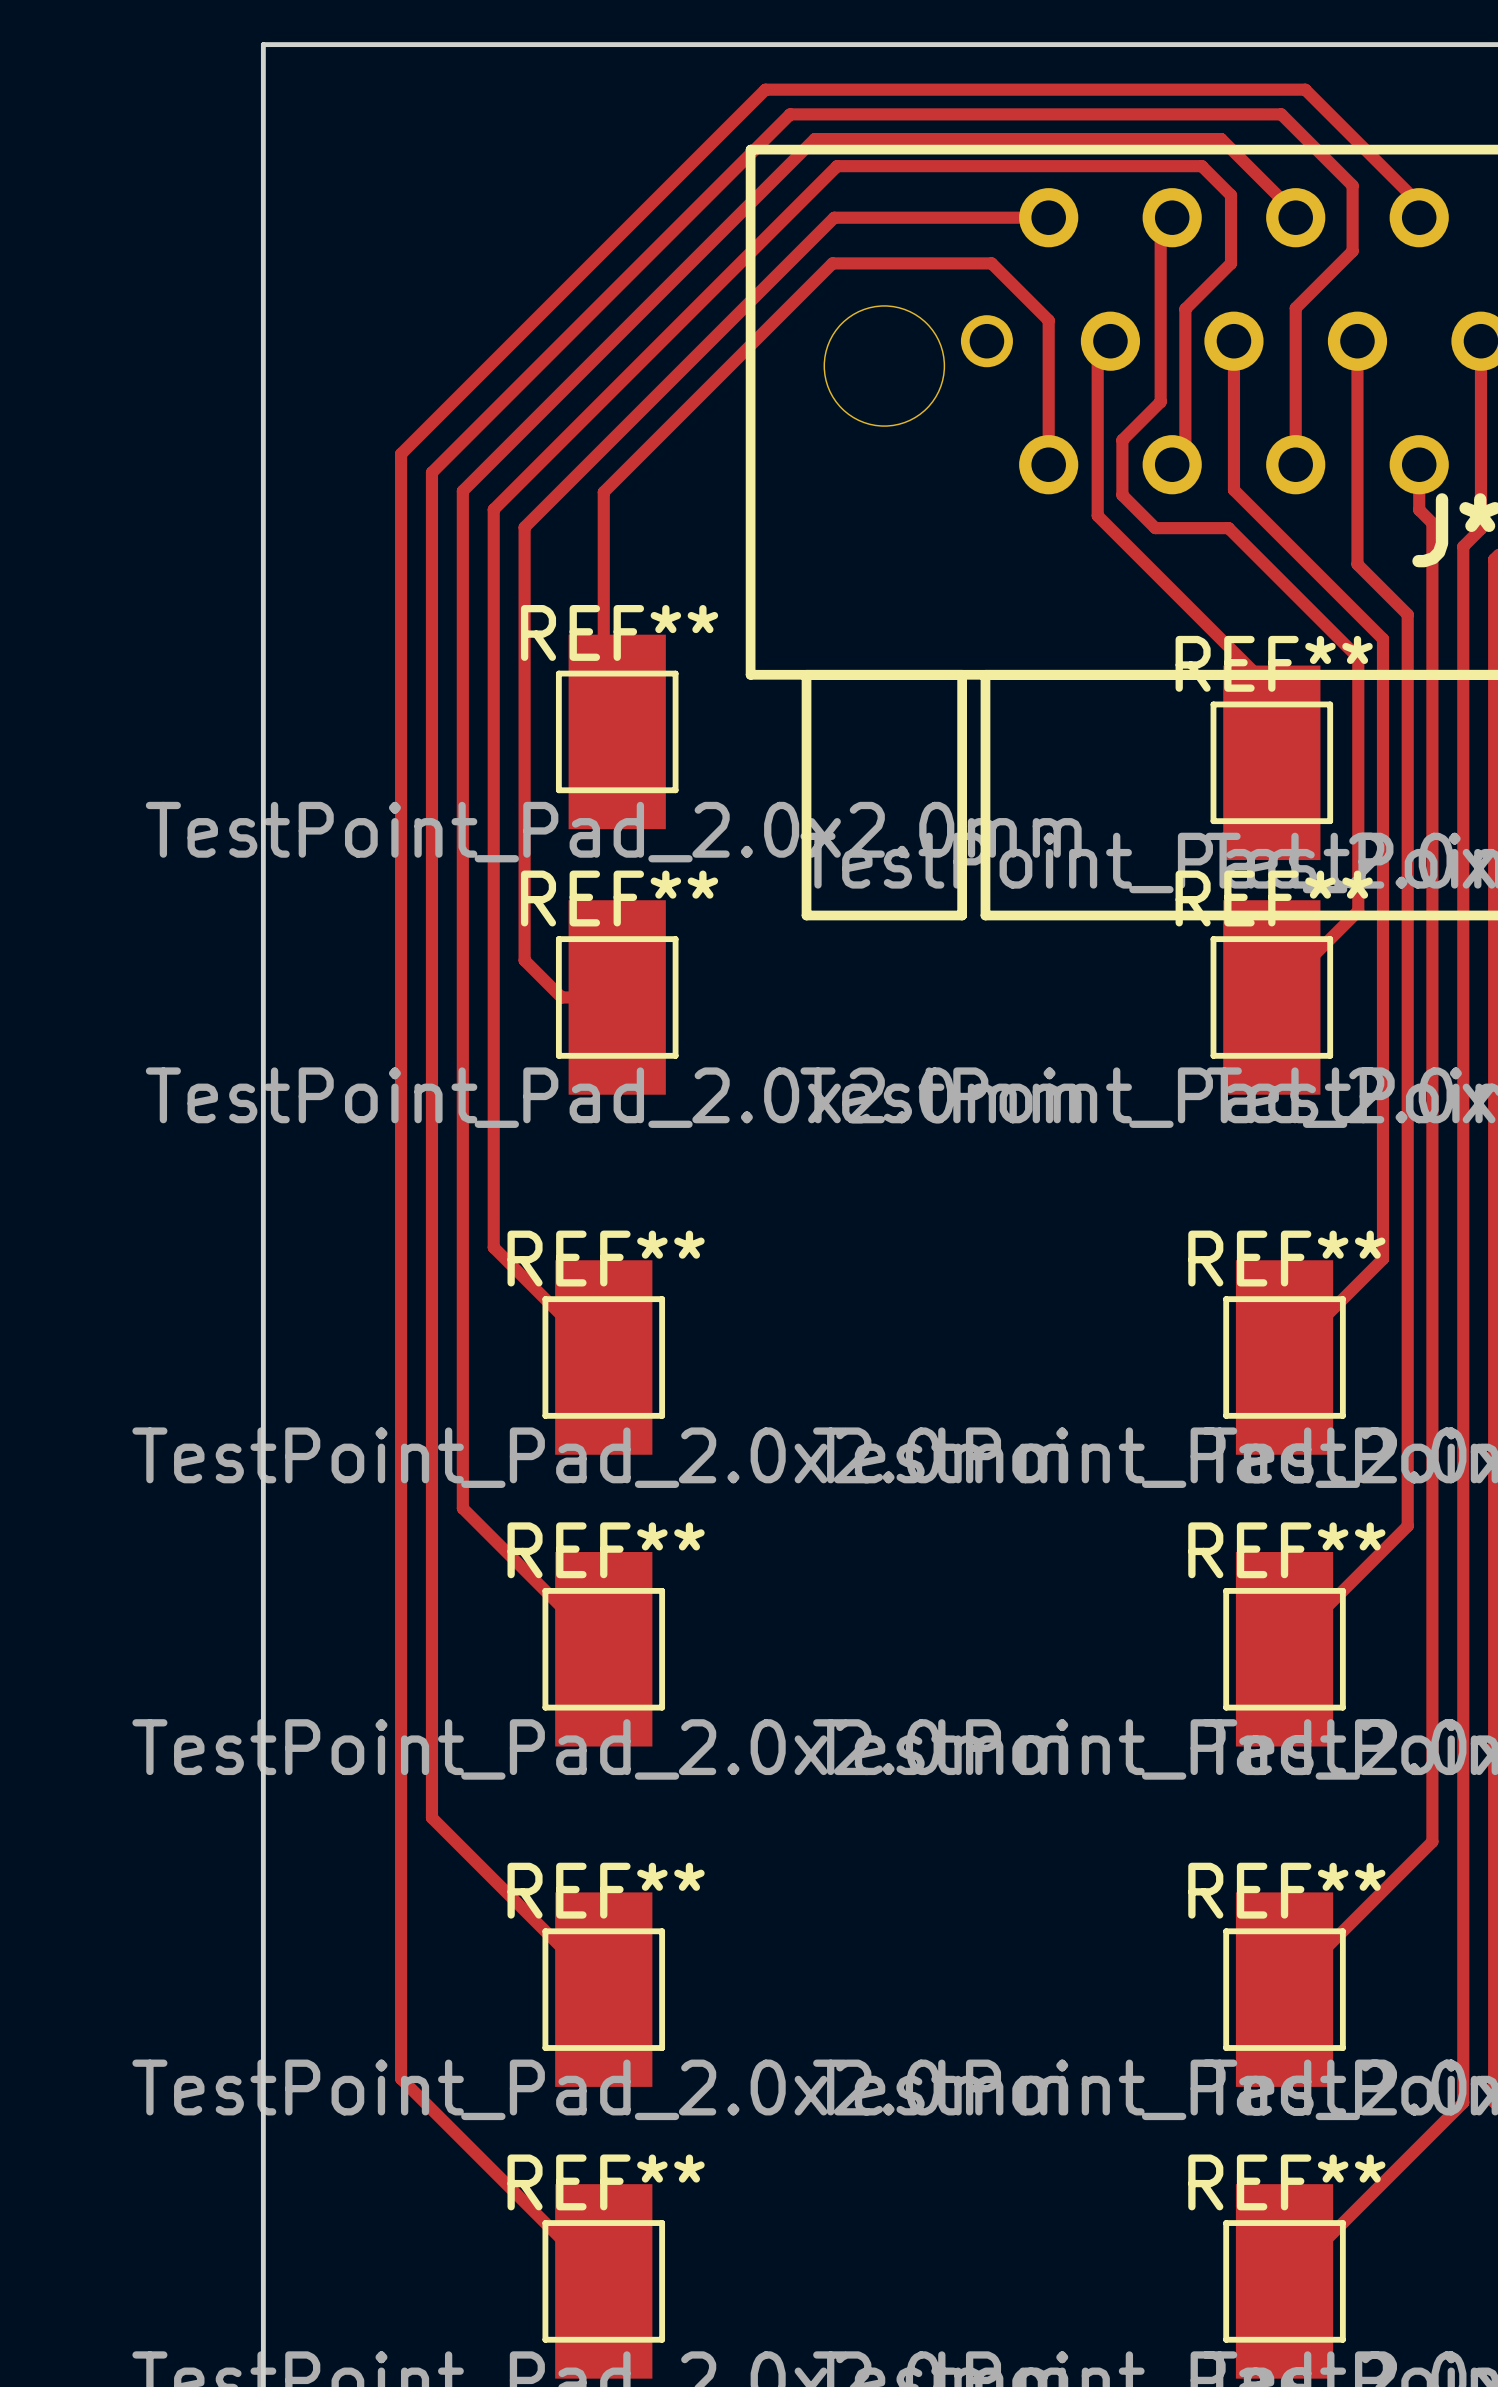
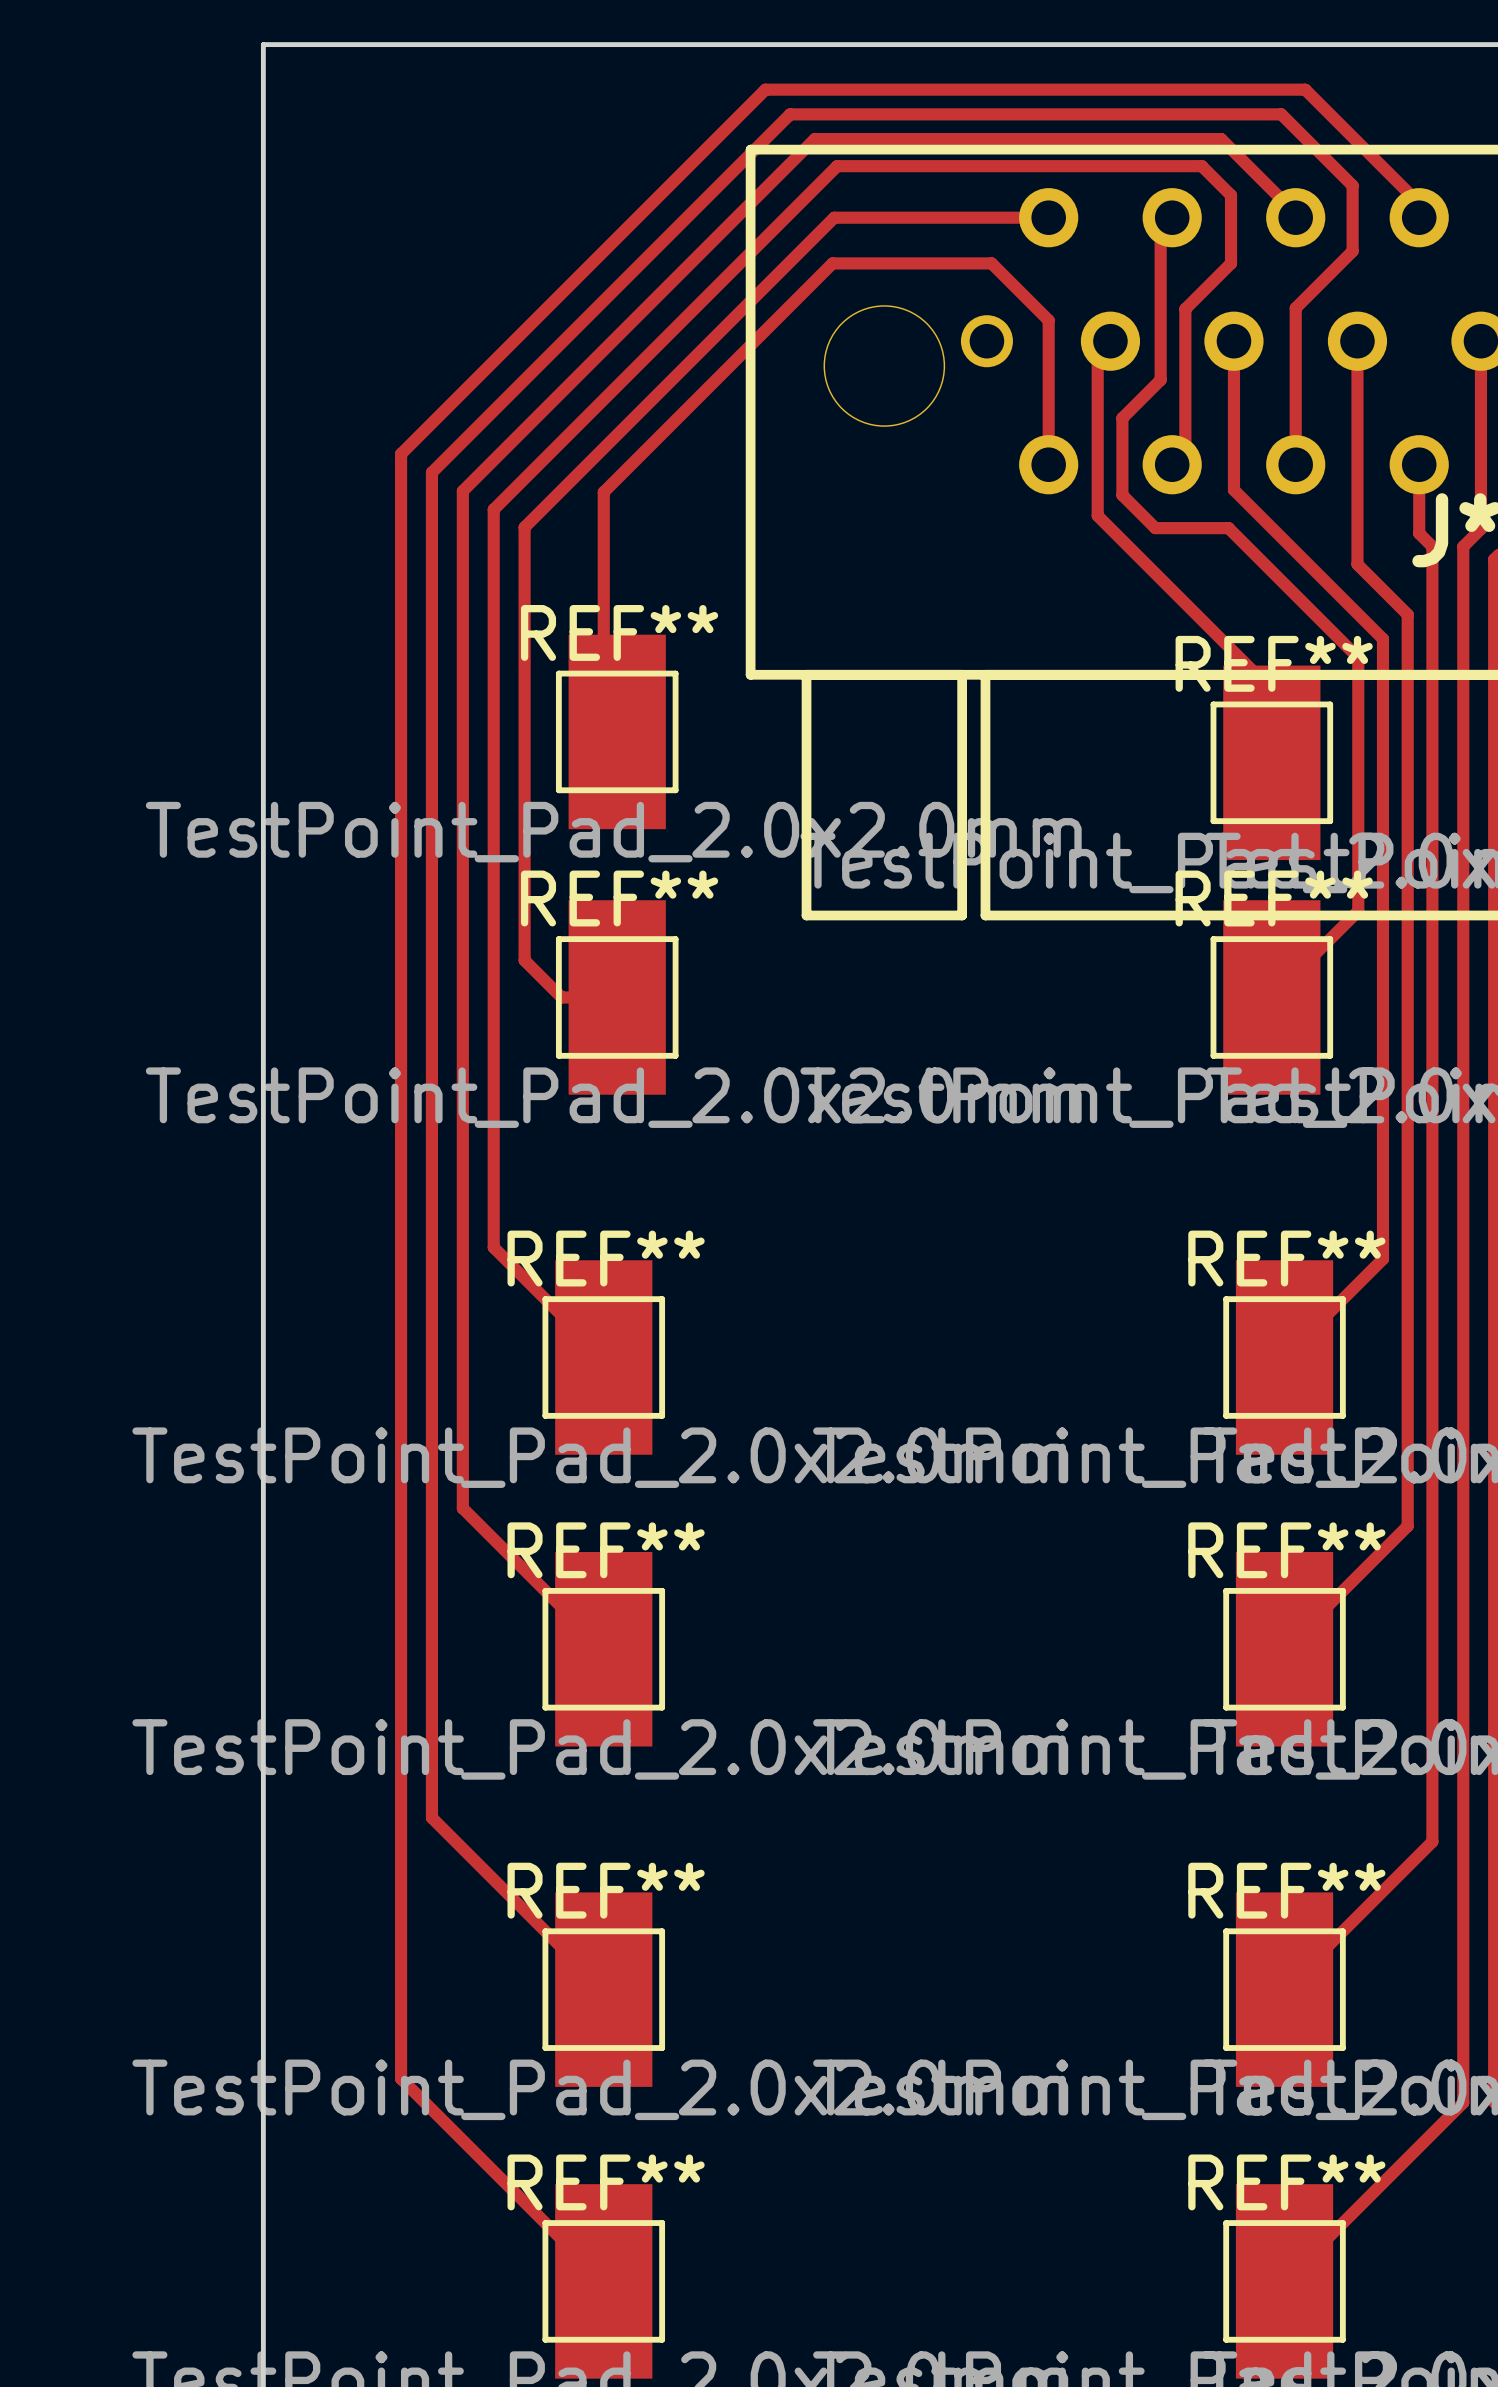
track: (1160, 379) (1160, 401) (1122, 440) -> (1160, 379) (1122, 418) (1122, 440)
track: (1419, 509) (1432, 523) (1432, 546) -> (1419, 509) (1419, 533) (1432, 546)

